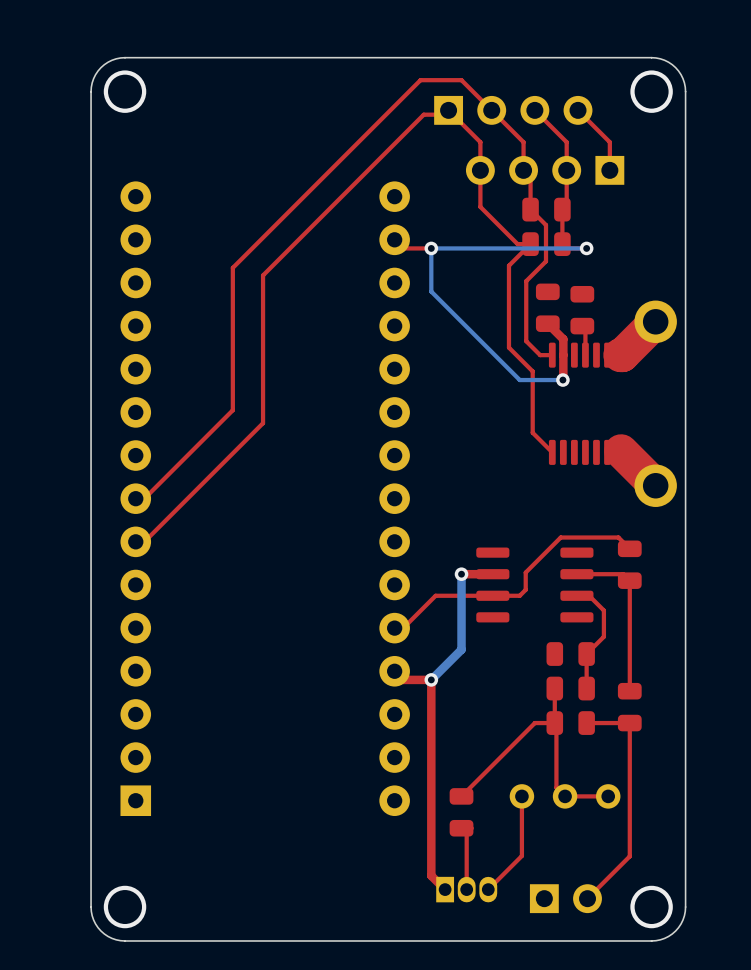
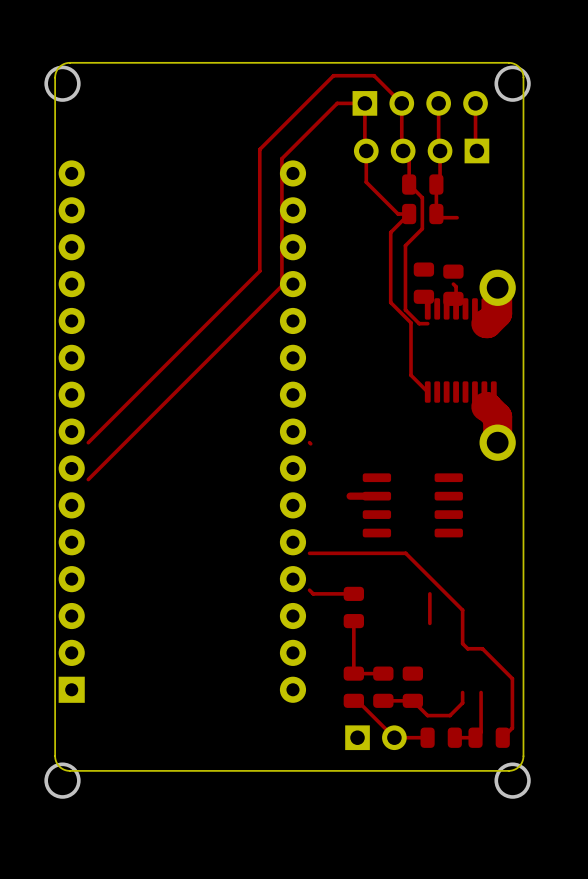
board edge: (651, 57) (125, 57) (108, 62) (95, 74) (91, 91) (91, 907) (95, 924) (108, 936) (125, 940) (651, 940) (668, 936) (681, 924) (685, 907) (685, 91) (682, 78) (675, 67) (664, 60) (651, 57) -> (508, 62) (519, 67) (523, 77) (523, 756) (521, 763) (516, 768) (508, 770) (69, 770) (62, 768) (57, 763) (55, 756) (55, 77) (57, 70) (62, 64) (69, 62) (508, 62)
part position: (513, 110) -> (420, 103)
top track: (534, 110) (566, 142) (566, 170) -> none
top track: (578, 110) (609, 142) (609, 170) -> none
top track: none -> (438, 103) (438, 149)
top track: none -> (475, 103) (475, 149)
top track: none -> (364, 149) (364, 103) (337, 103) (281, 158) (281, 285) (88, 479)
top track: none -> (401, 149) (401, 103) (374, 75) (333, 75) (259, 149) (259, 271) (88, 442)
top track: (480, 170) (480, 142) (448, 110) (444, 114) (423, 114) (263, 275) (263, 423) (135, 550) -> none
top track: (523, 170) (523, 142) (461, 80) (420, 80) (232, 267) (232, 410) (135, 507) -> none
bottom track: (586, 244) (582, 248) (431, 248) (431, 291) (519, 380) (562, 380) -> none
top track: (431, 248) (394, 248) -> none
via: (431, 248) -> none
via: (586, 248) -> none
part position: (547, 307) -> (423, 283)
part position: (582, 310) -> (453, 285)
top track: (655, 321) (620, 355) -> none
part position: (655, 321) -> (497, 287)
top track: (547, 323) (563, 339) (562, 380) -> none
top track: none -> (497, 287) (497, 313) (485, 323)
top track: (526, 341) (540, 355) (552, 355) -> (405, 297) (405, 309) (419, 323) (427, 323)
via: (562, 380) -> none
top track: (621, 451) (655, 485) -> none
top track: none -> (485, 406) (497, 417) (497, 442)
part position: (655, 485) -> (497, 442)
top track: none -> (309, 442) (310, 443)
top track: (629, 548) (618, 537) (560, 537) (525, 572) (525, 589) (519, 595) (435, 595) (394, 636) -> none
part: (629, 564) -> none
bottom track: (461, 574) (461, 649) (431, 679) -> none
via: (461, 574) -> none
top track: (576, 574) (623, 574) (629, 580) (629, 691) -> none
top track: (576, 595) (589, 595) (603, 610) (603, 636) (586, 654) (586, 688) -> none
top track: none -> (309, 553) (405, 553) (462, 610) (462, 643) (467, 648) (482, 648) (512, 678) (512, 728) (502, 737)
part: (570, 654) -> none
top track: (394, 671) (403, 679) (431, 679) (431, 875) (445, 889) -> none
via: (431, 679) -> none
top track: none -> (309, 590) (313, 593) (353, 593)
part: (570, 688) -> none
part: none -> (353, 607)
part: (629, 707) -> none
top track: (586, 718) (586, 723) (629, 723) -> none
top track: none -> (353, 621) (353, 673) (383, 673)
part: (570, 723) -> none
top track: (629, 723) (629, 856) (587, 898) -> none
top track: (521, 796) (521, 855) (488, 889) -> none
part: (565, 796) -> none
top track: (608, 796) (565, 796) (556, 787) (556, 724) (554, 723) (534, 723) (461, 796) -> none
part: none -> (383, 687)
part: none -> (412, 687)
top track: none -> (462, 692) (462, 702) (450, 715) (427, 715) (412, 700) (383, 700)
top track: none -> (481, 692) (481, 732) (475, 737) (454, 737)
part position: (461, 812) -> (353, 687)
top track: none -> (353, 700) (357, 700) (394, 737) (427, 737)
top track: (471, 828) (461, 828) (466, 833) (466, 889) -> none
part: none -> (441, 737)
part: none -> (489, 737)
part: (466, 889) -> none
part position: (565, 898) -> (375, 737)

